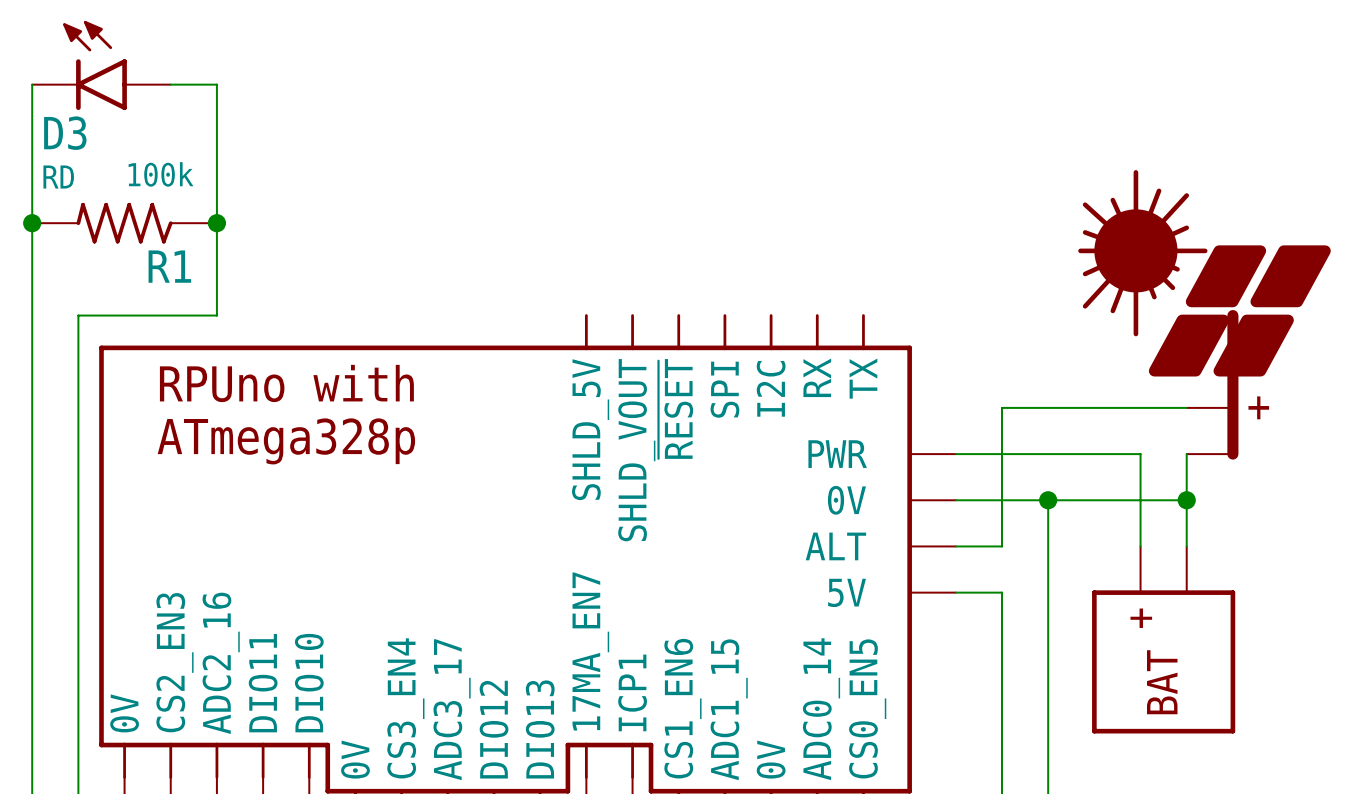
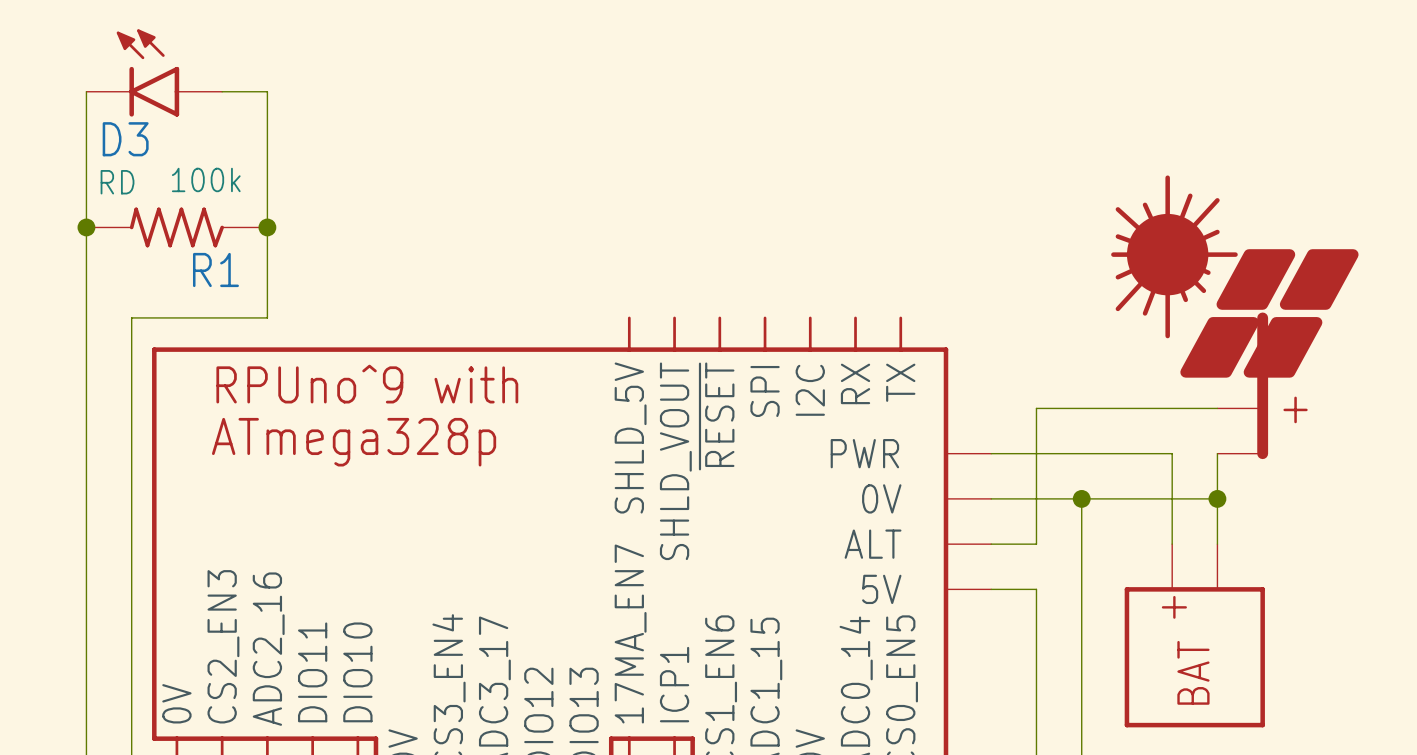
part text: RPUno with (286, 383) -> RPUno^9 with (367, 384)

